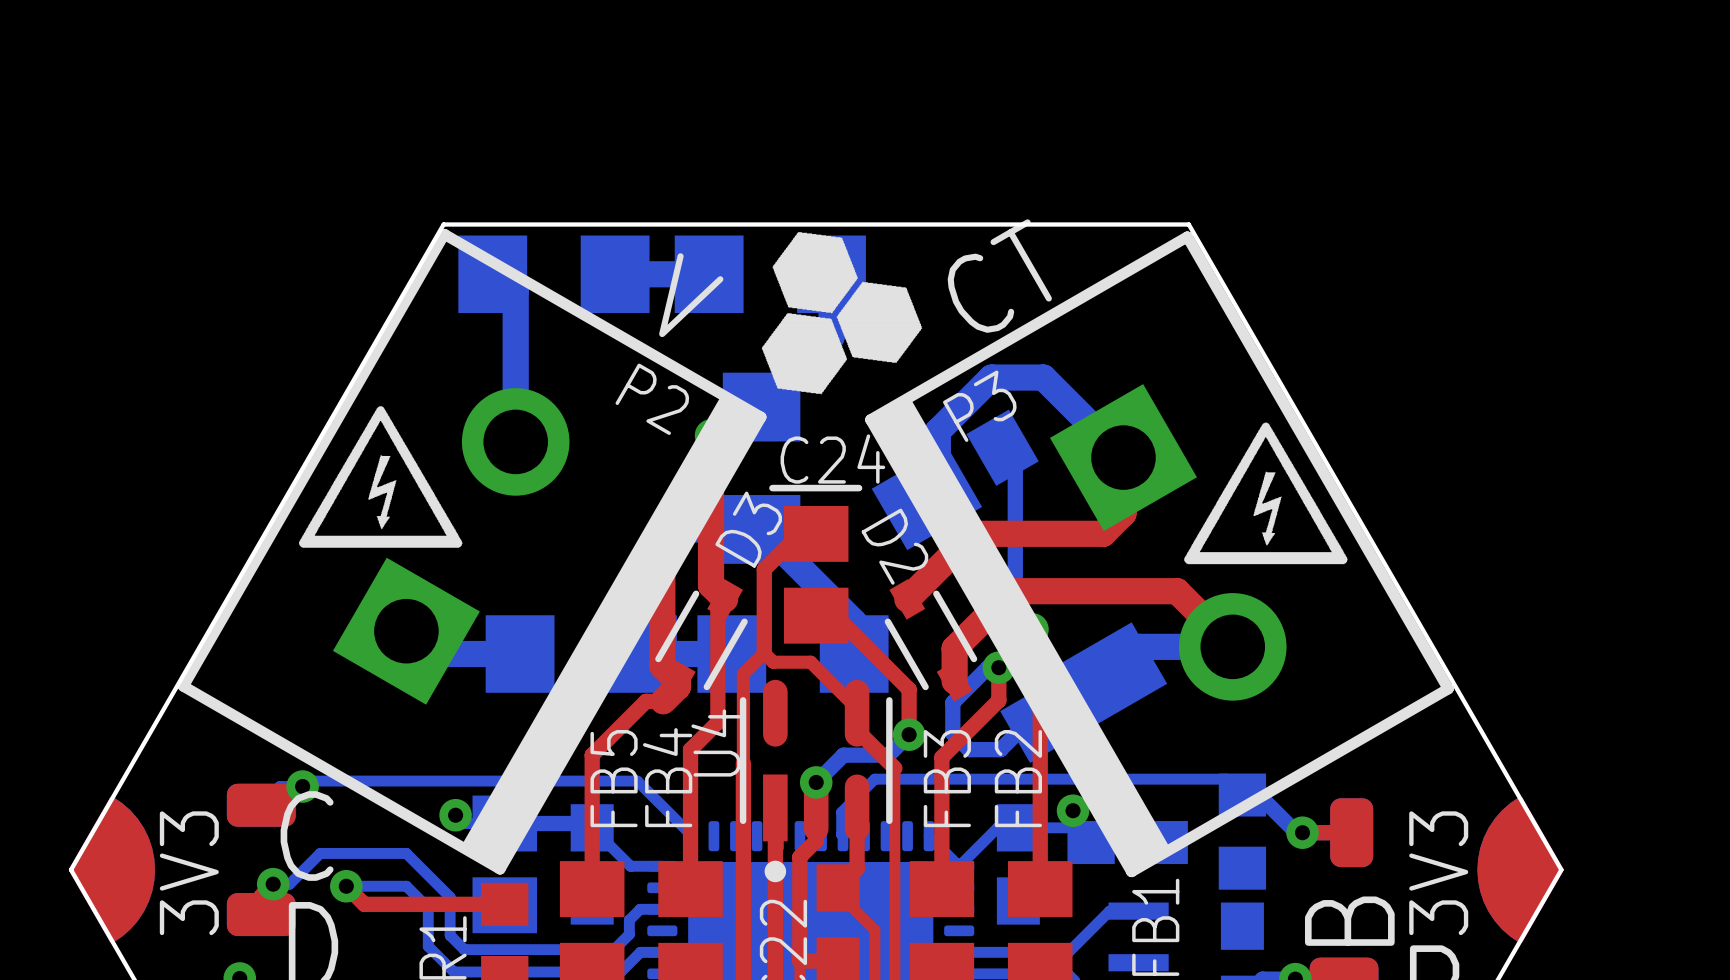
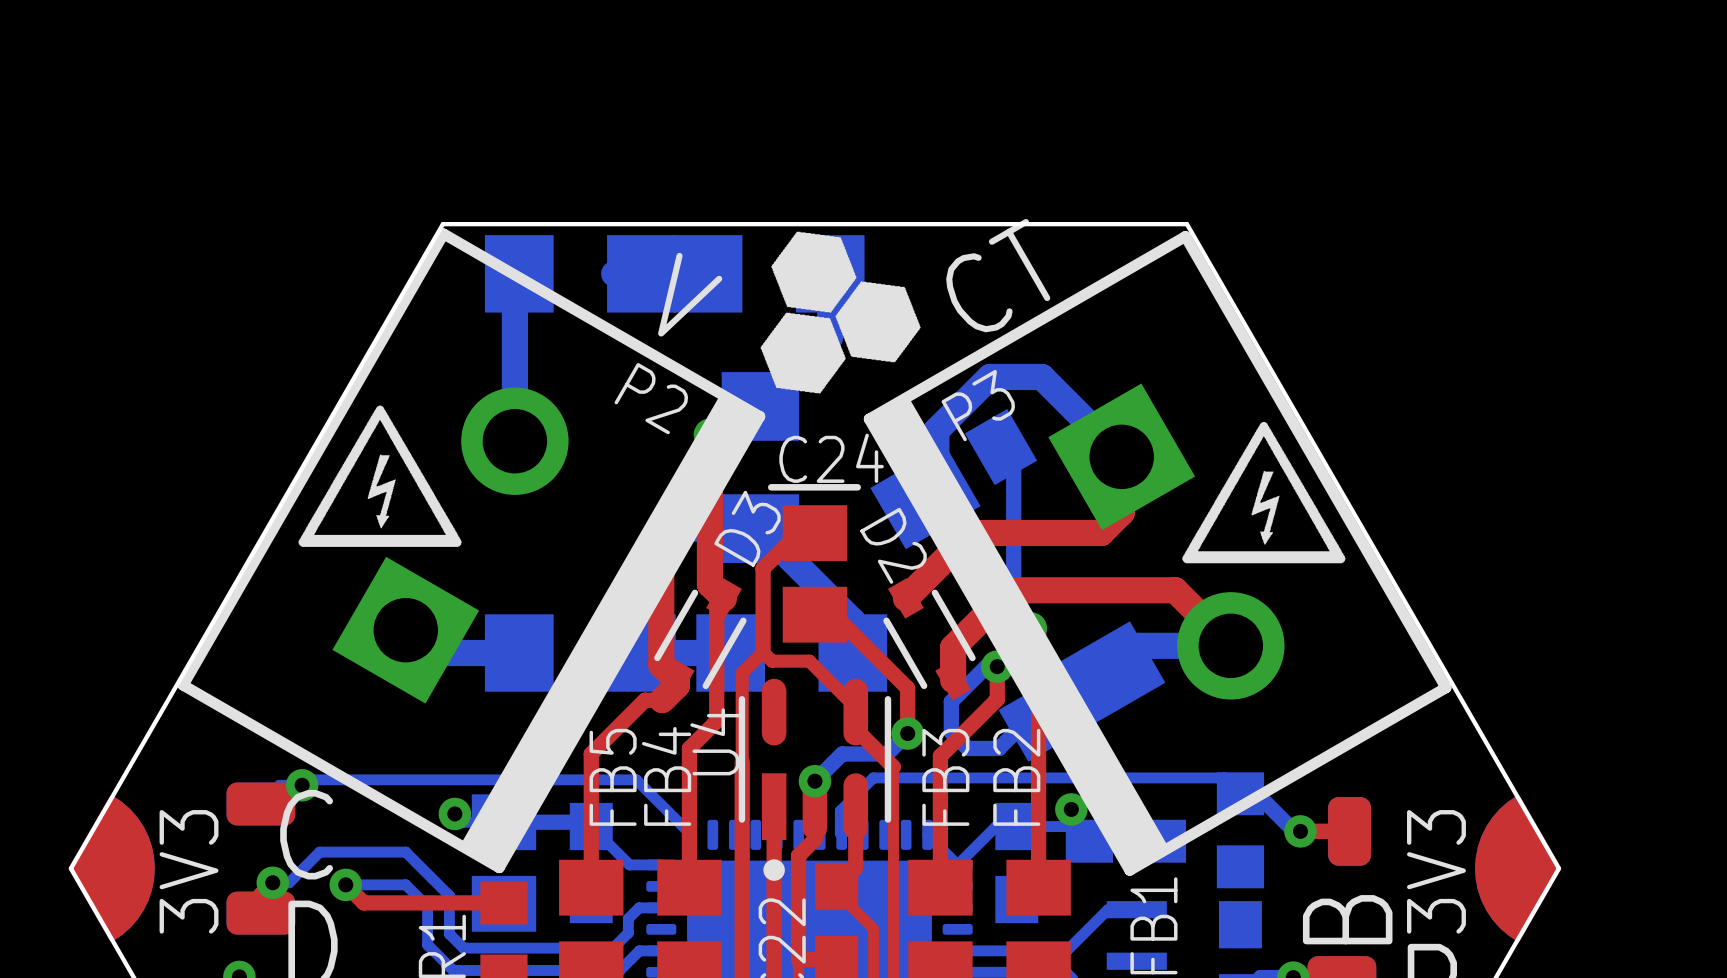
part position: (553, 274) -> (580, 273)

